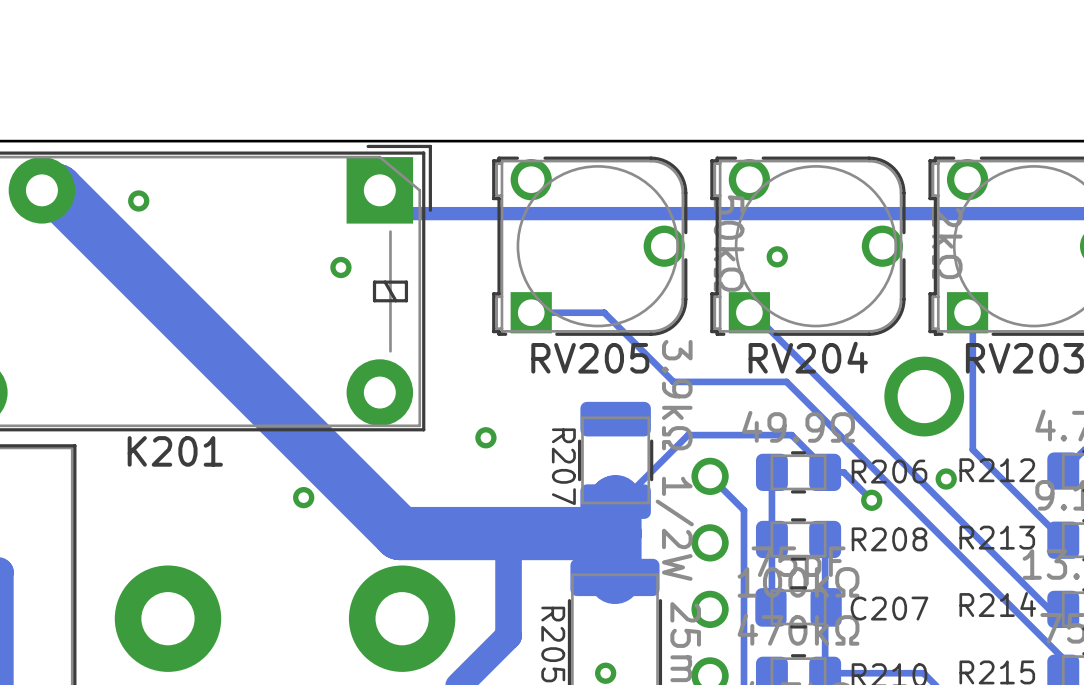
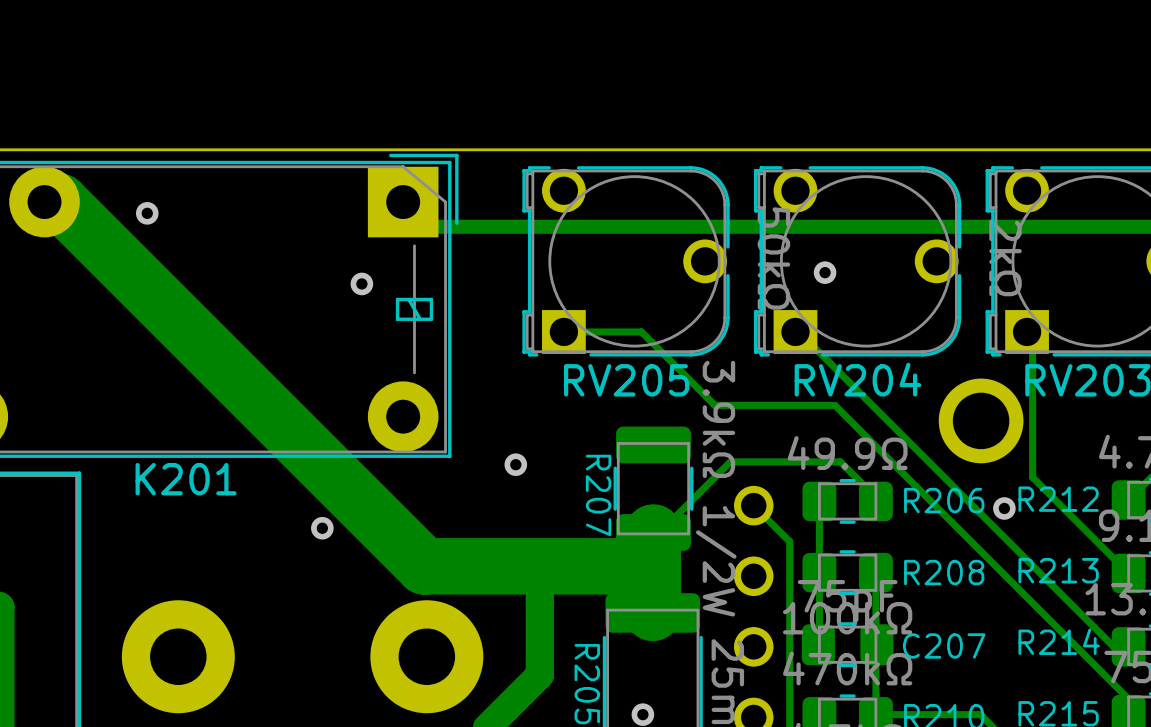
track: (825, 472) (843, 472) (871, 500) -> none
via: (871, 500) -> none

